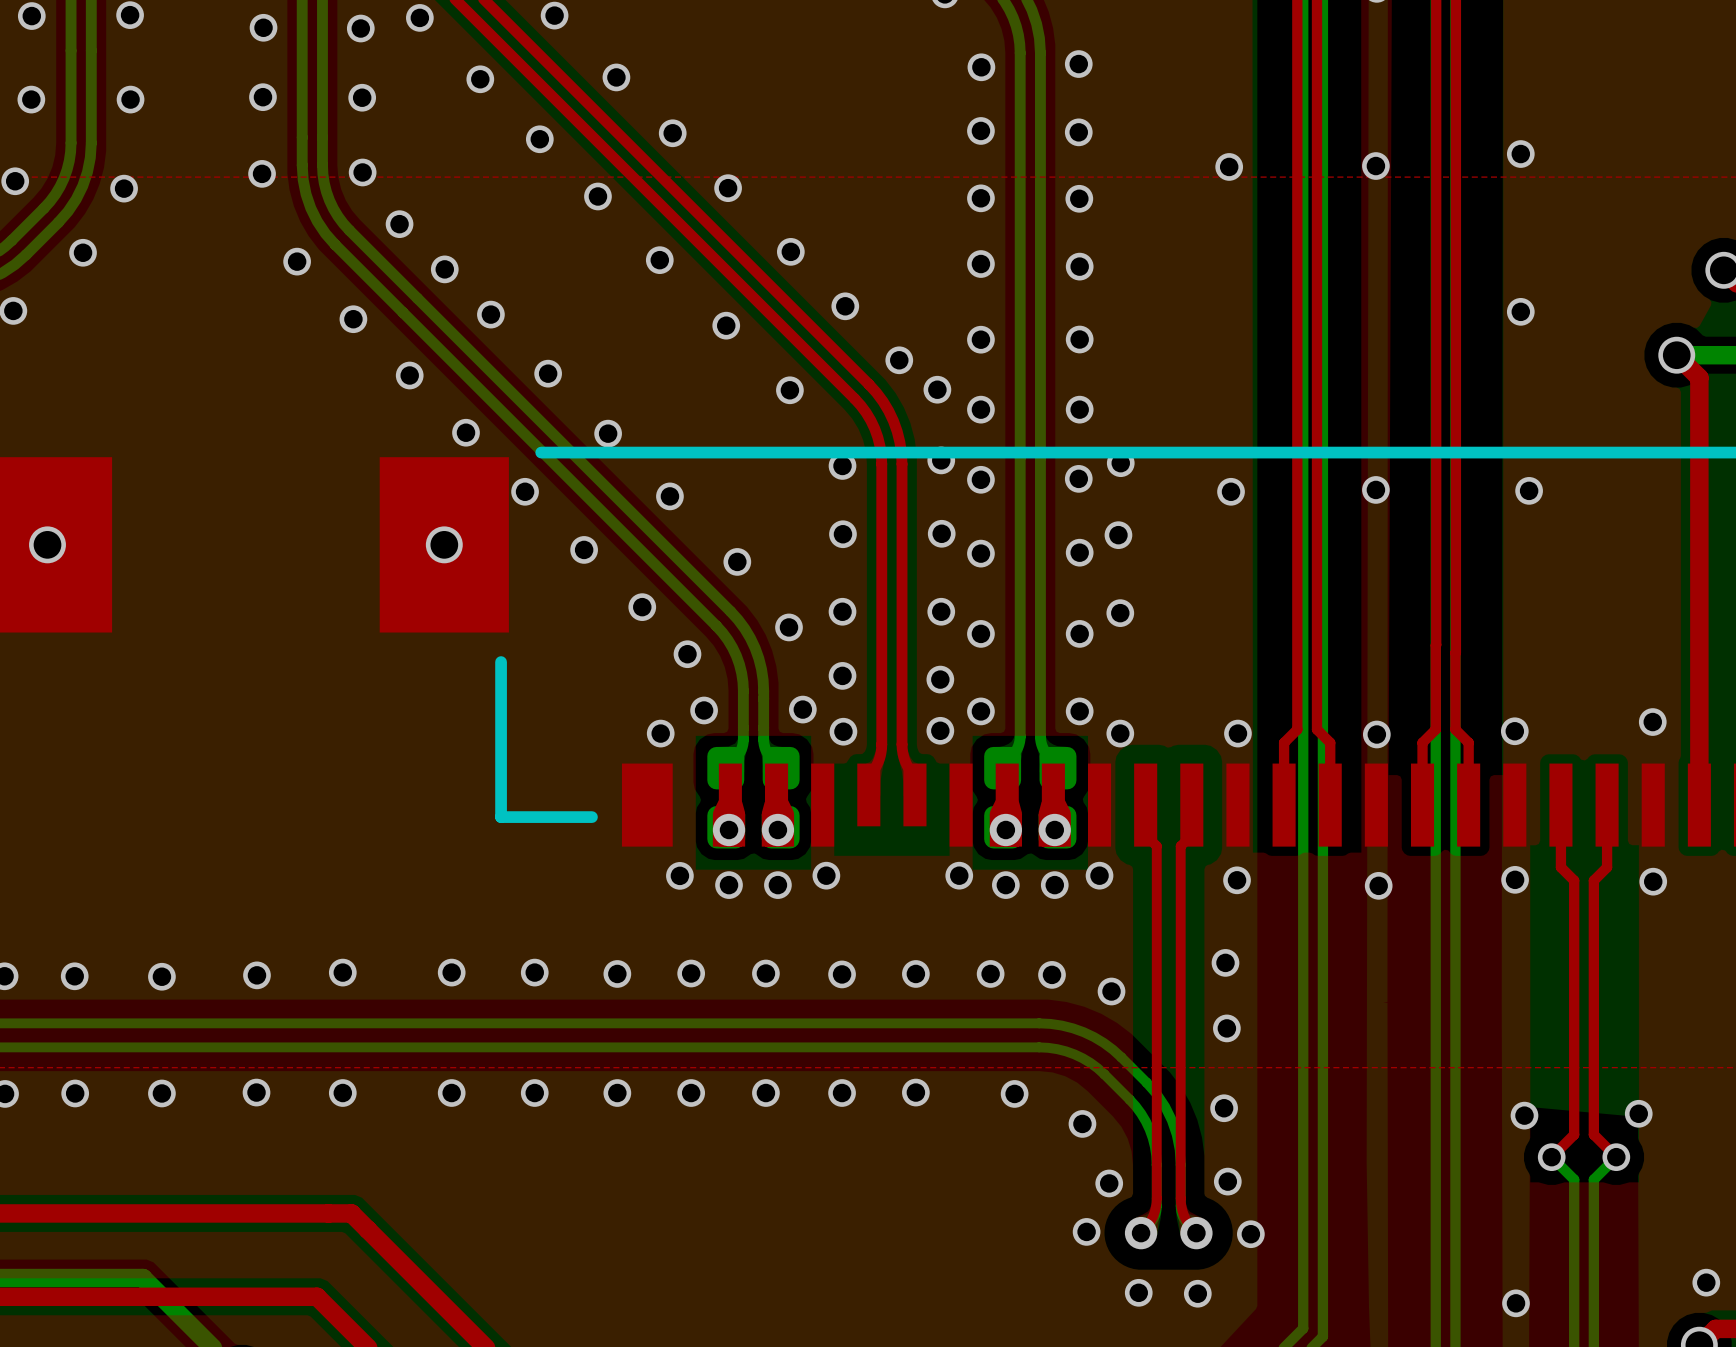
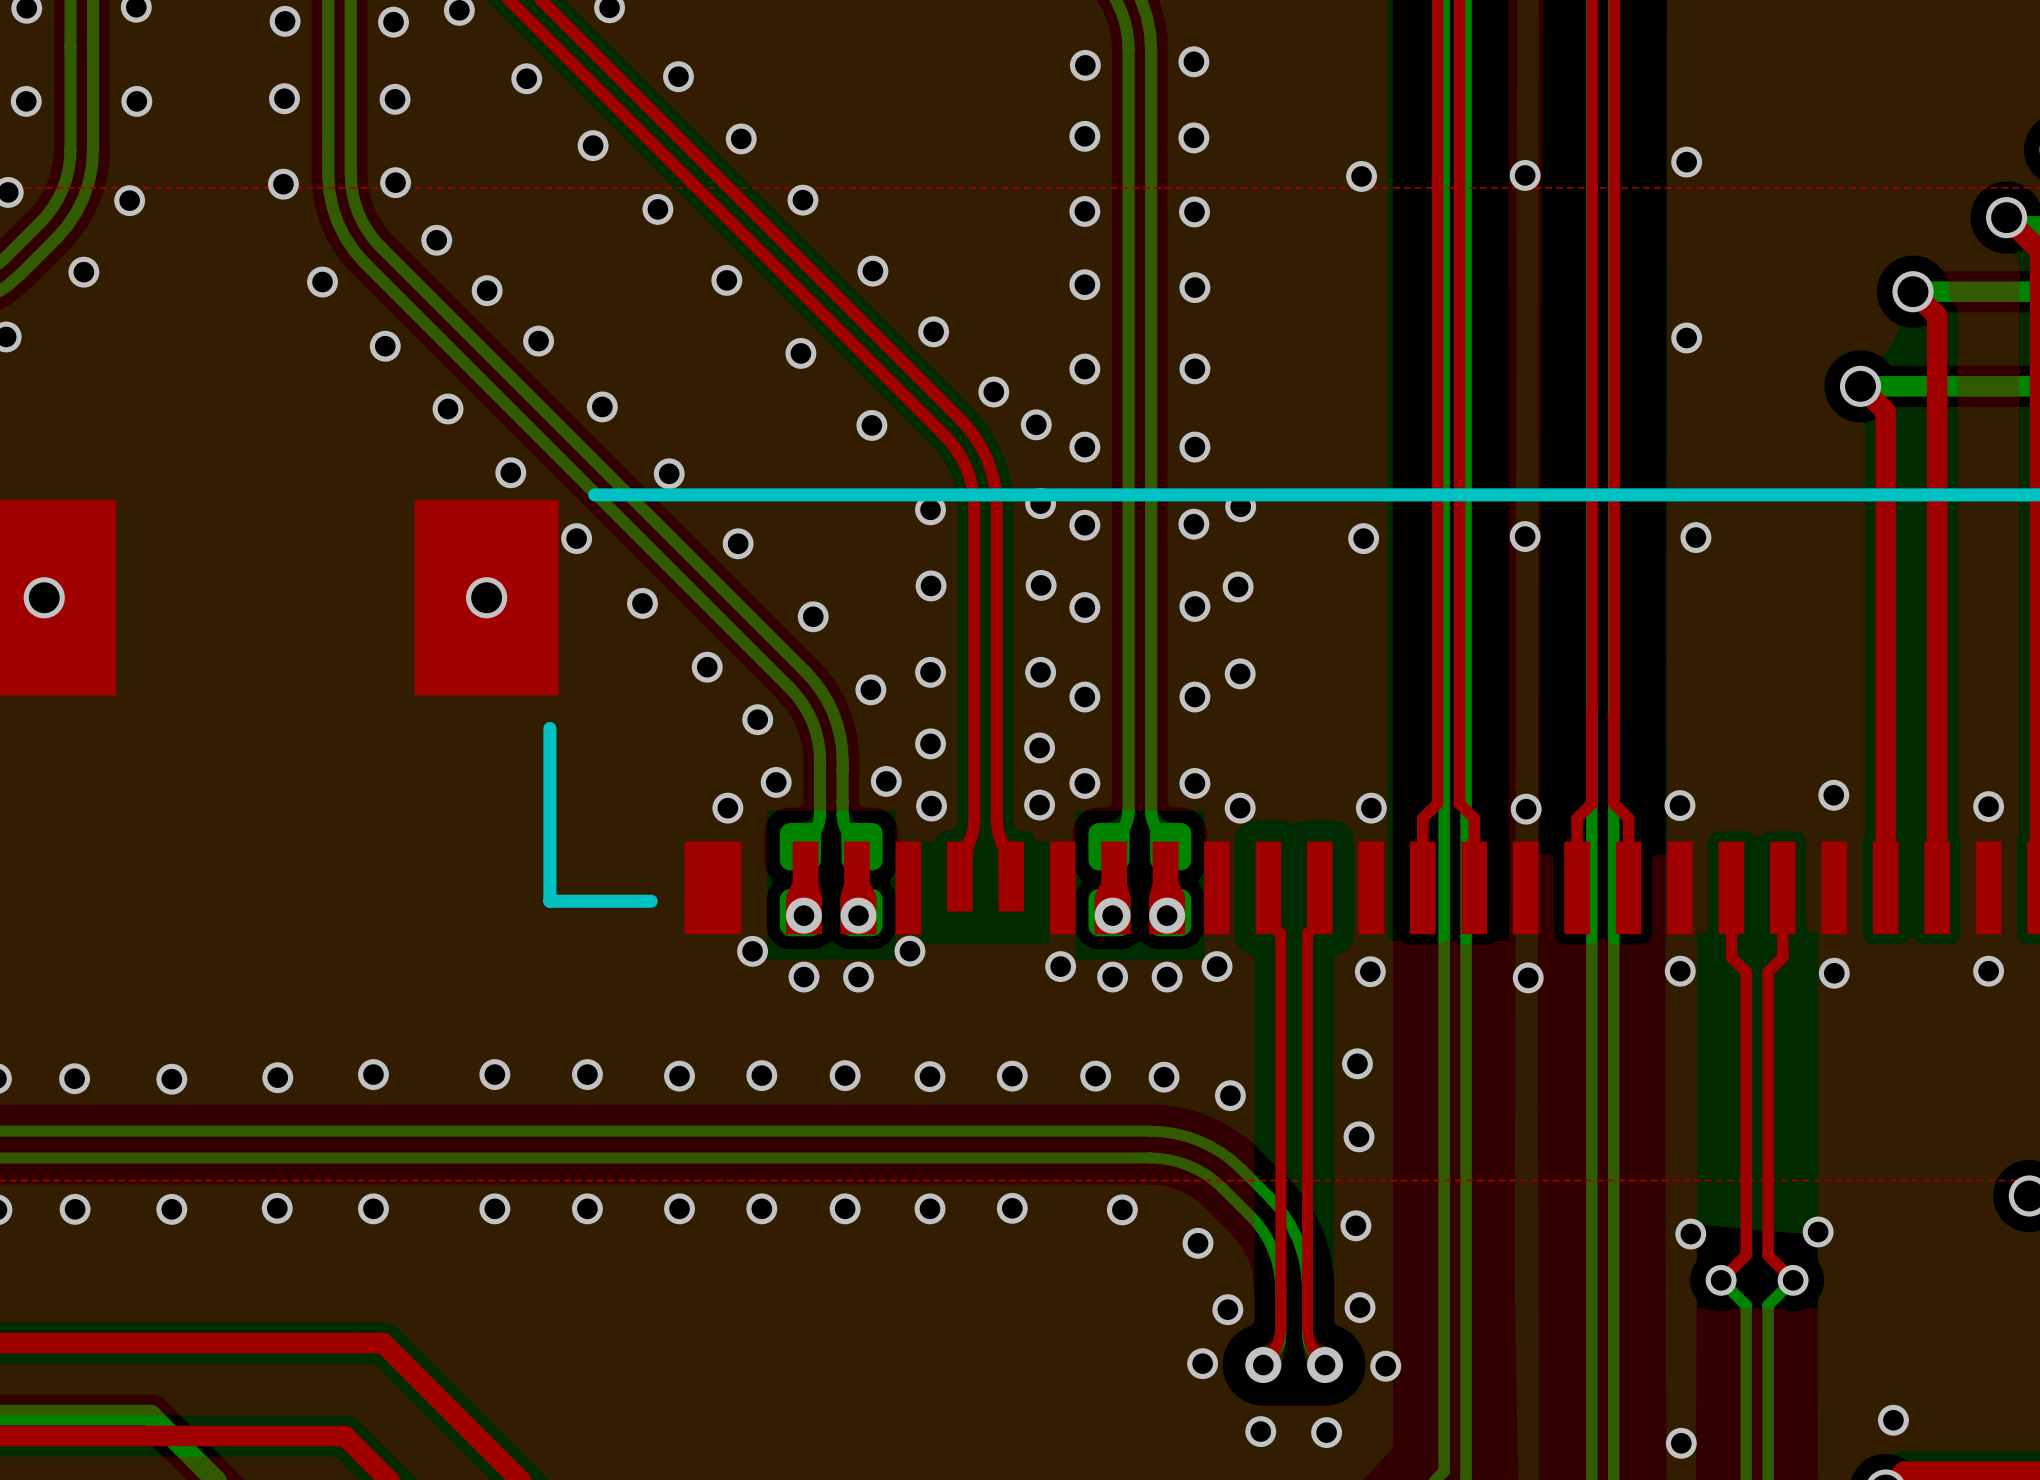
via position: (679, 875) -> (752, 951)
via position: (826, 875) -> (909, 951)

